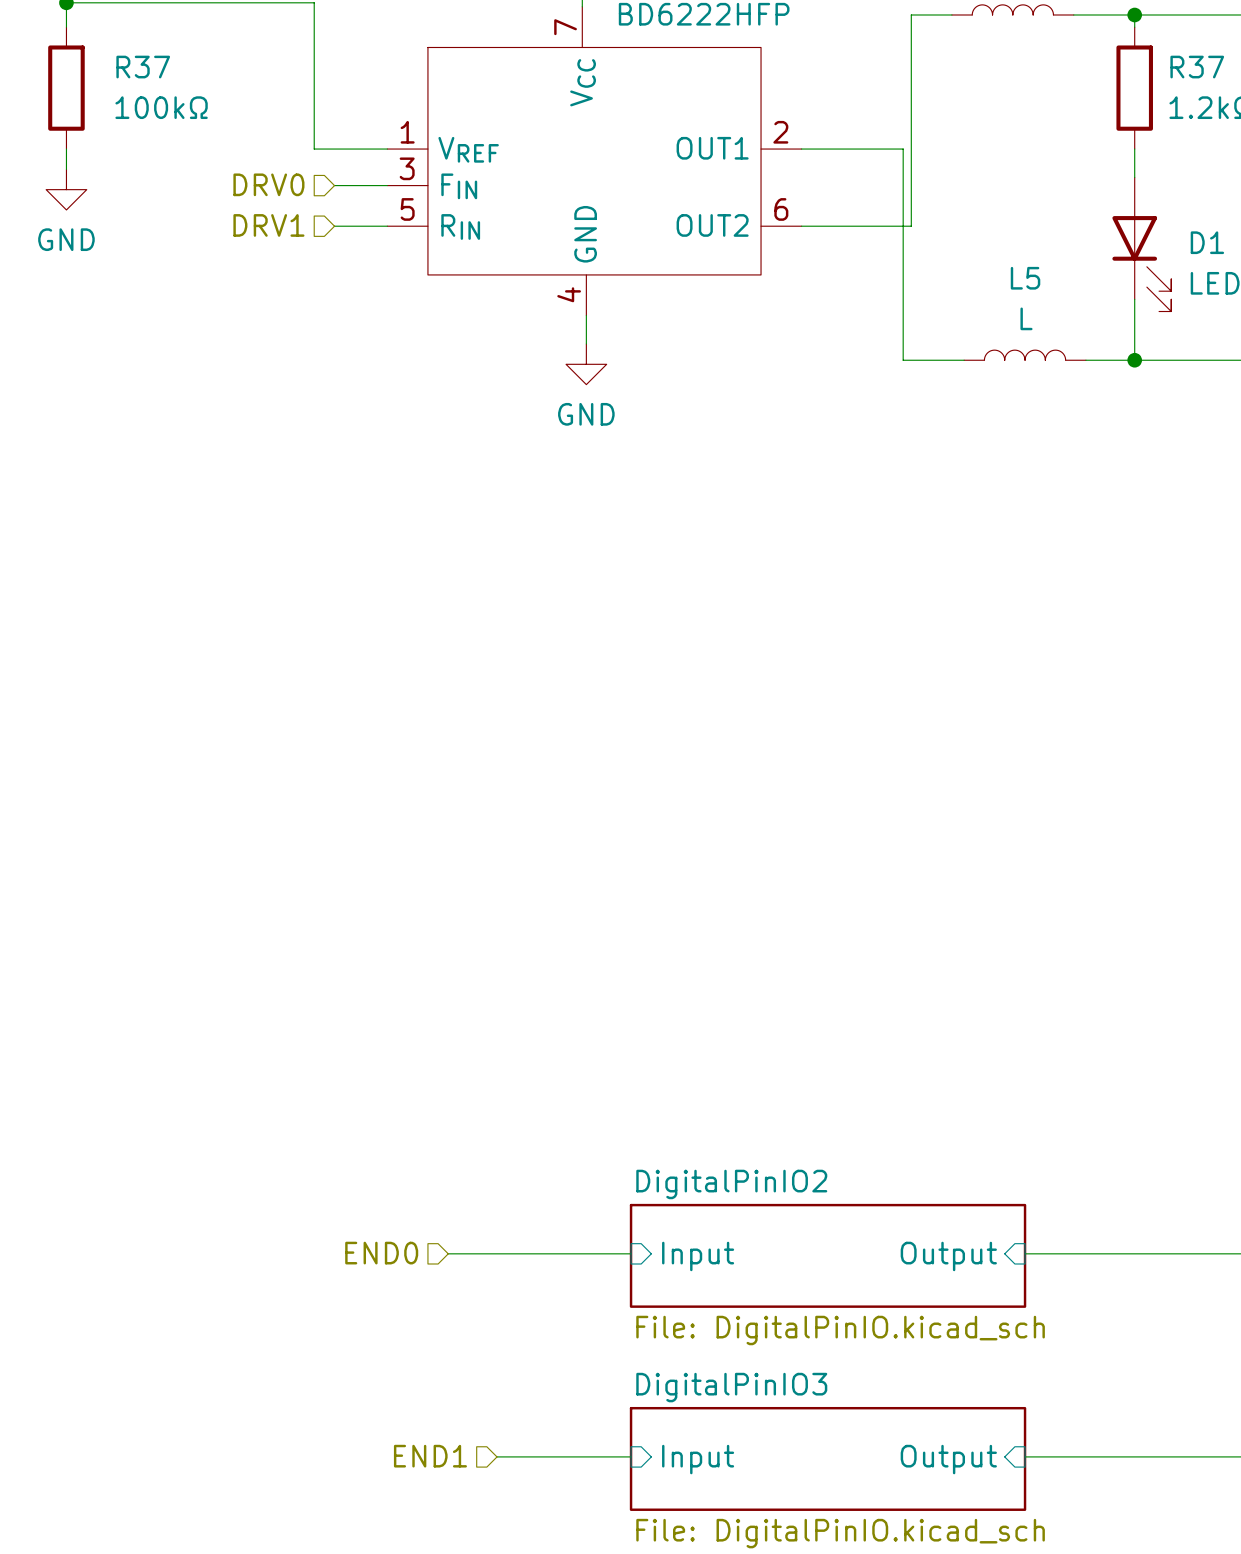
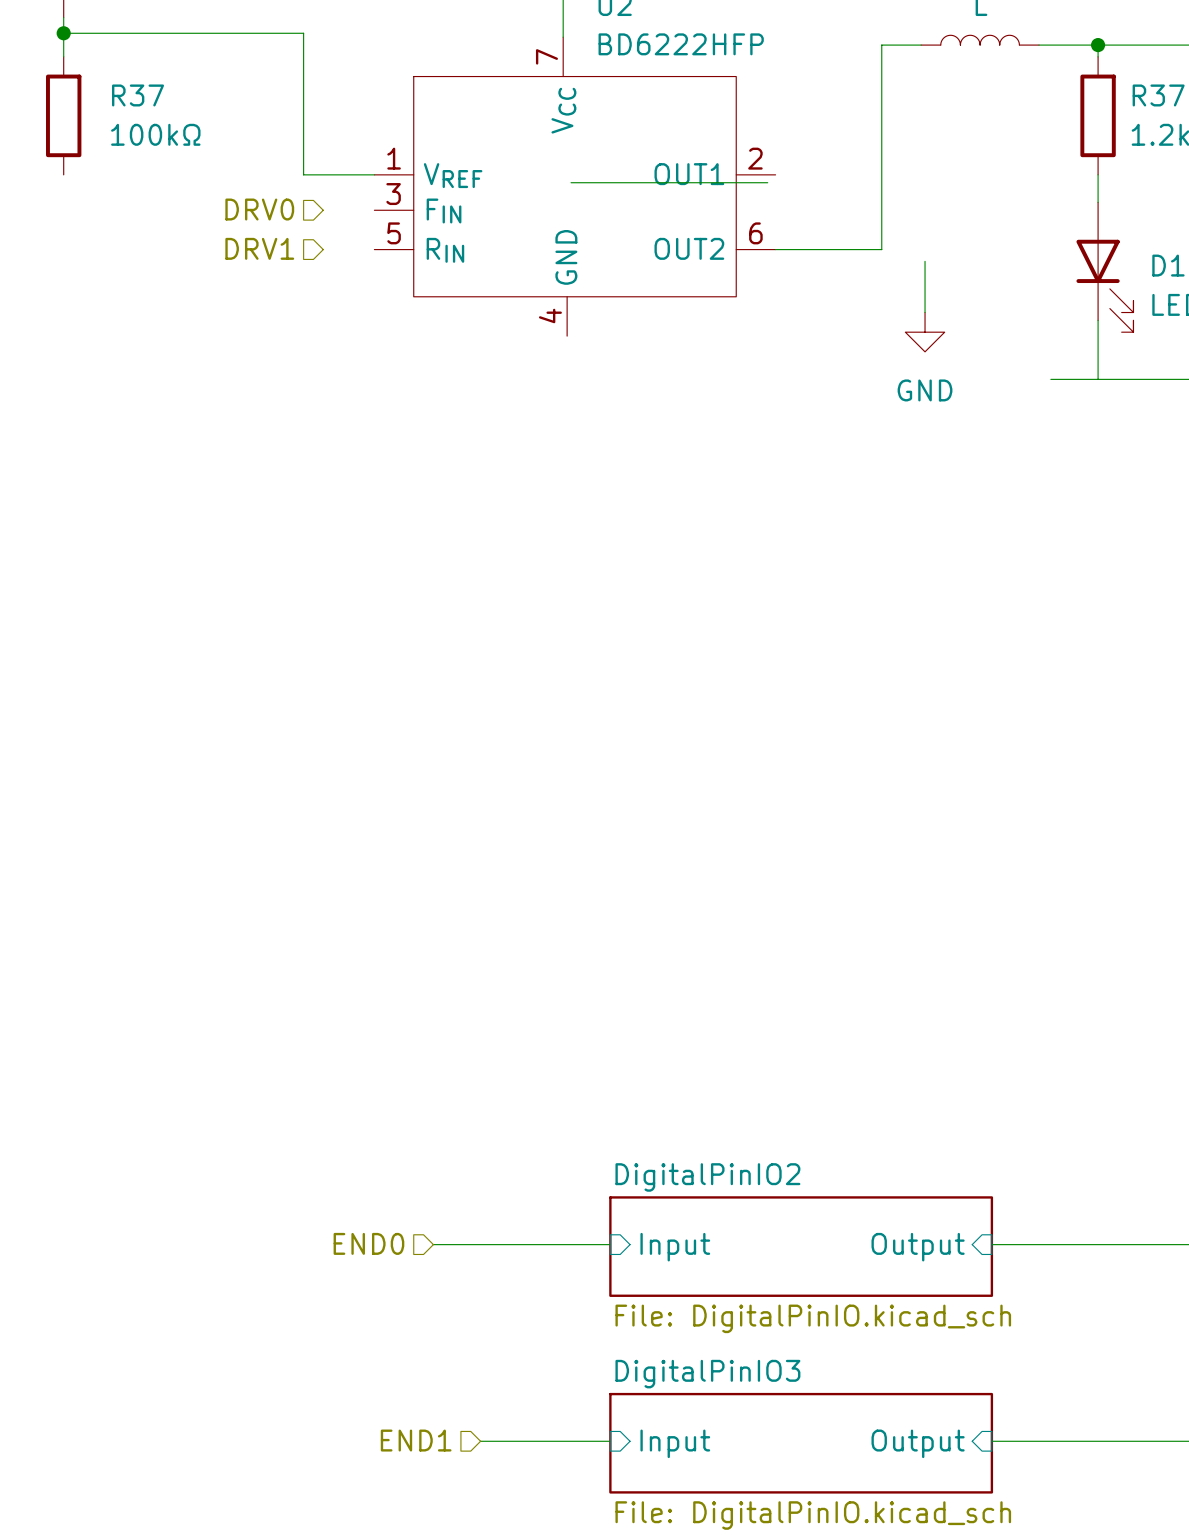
wire: (66, 149) (66, 169) -> none
wire: (801, 149) (903, 149) (903, 360) (964, 360) -> none
wire: none -> (571, 182) (767, 182)
wire: (334, 185) (387, 185) -> none
power symbol: GND (66, 189) -> none
wire: (334, 226) (387, 226) -> none
wire: none -> (925, 261) (925, 312)
wire: (586, 315) (586, 344) -> none
L5: L (1025, 355) -> none
junction: (1134, 360) -> none
power symbol position: GND (586, 364) -> GND (925, 332)
power symbol text position: GND (586, 414) -> GND (925, 390)

